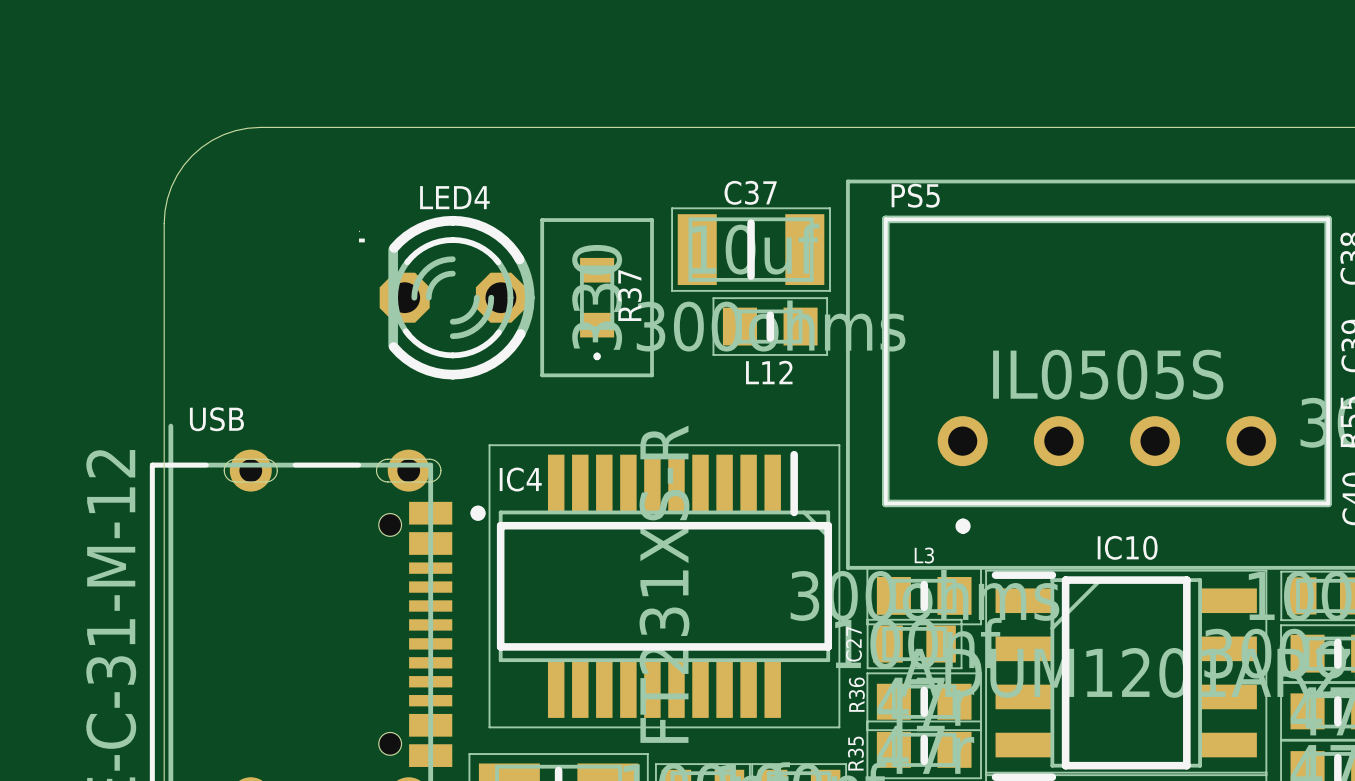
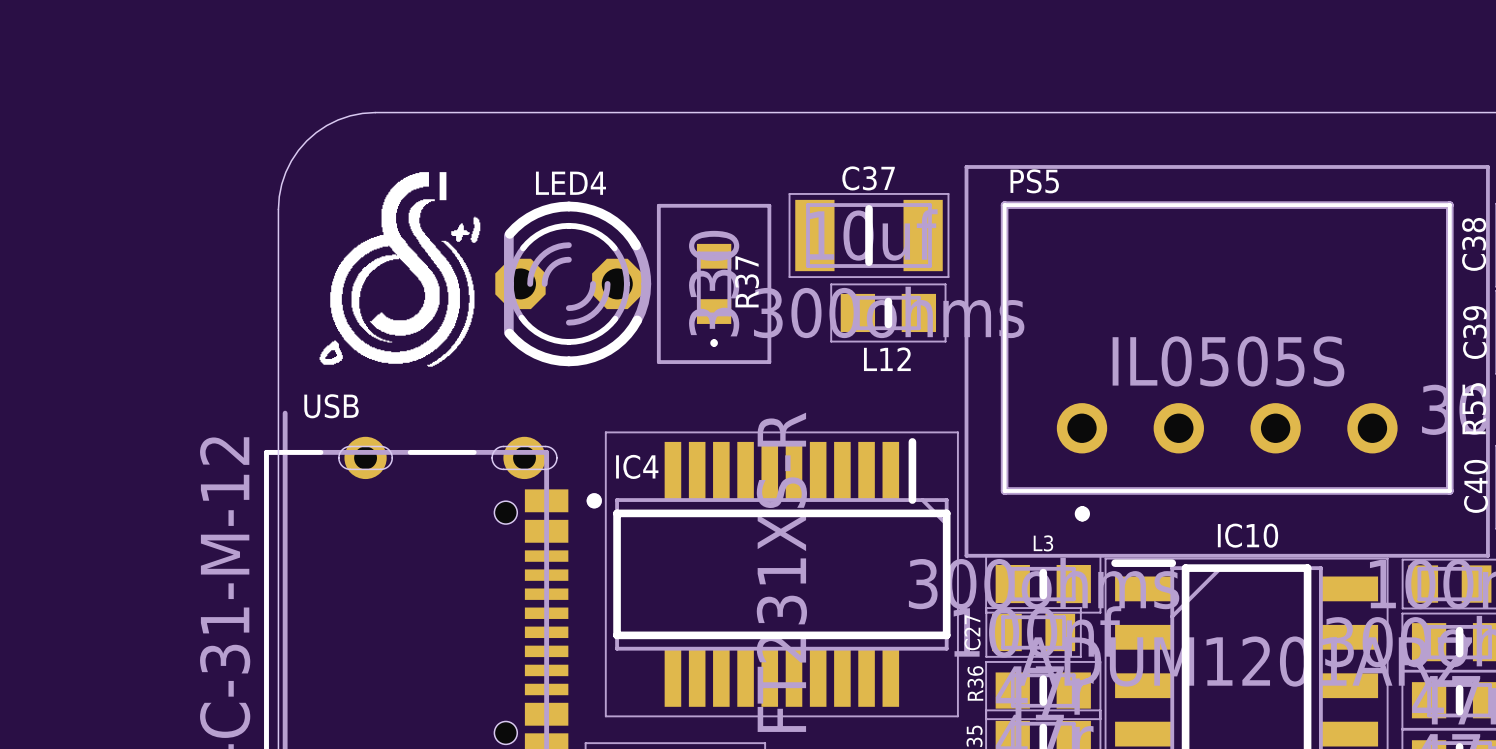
drawing: none -> [319, 172, 481, 367]

